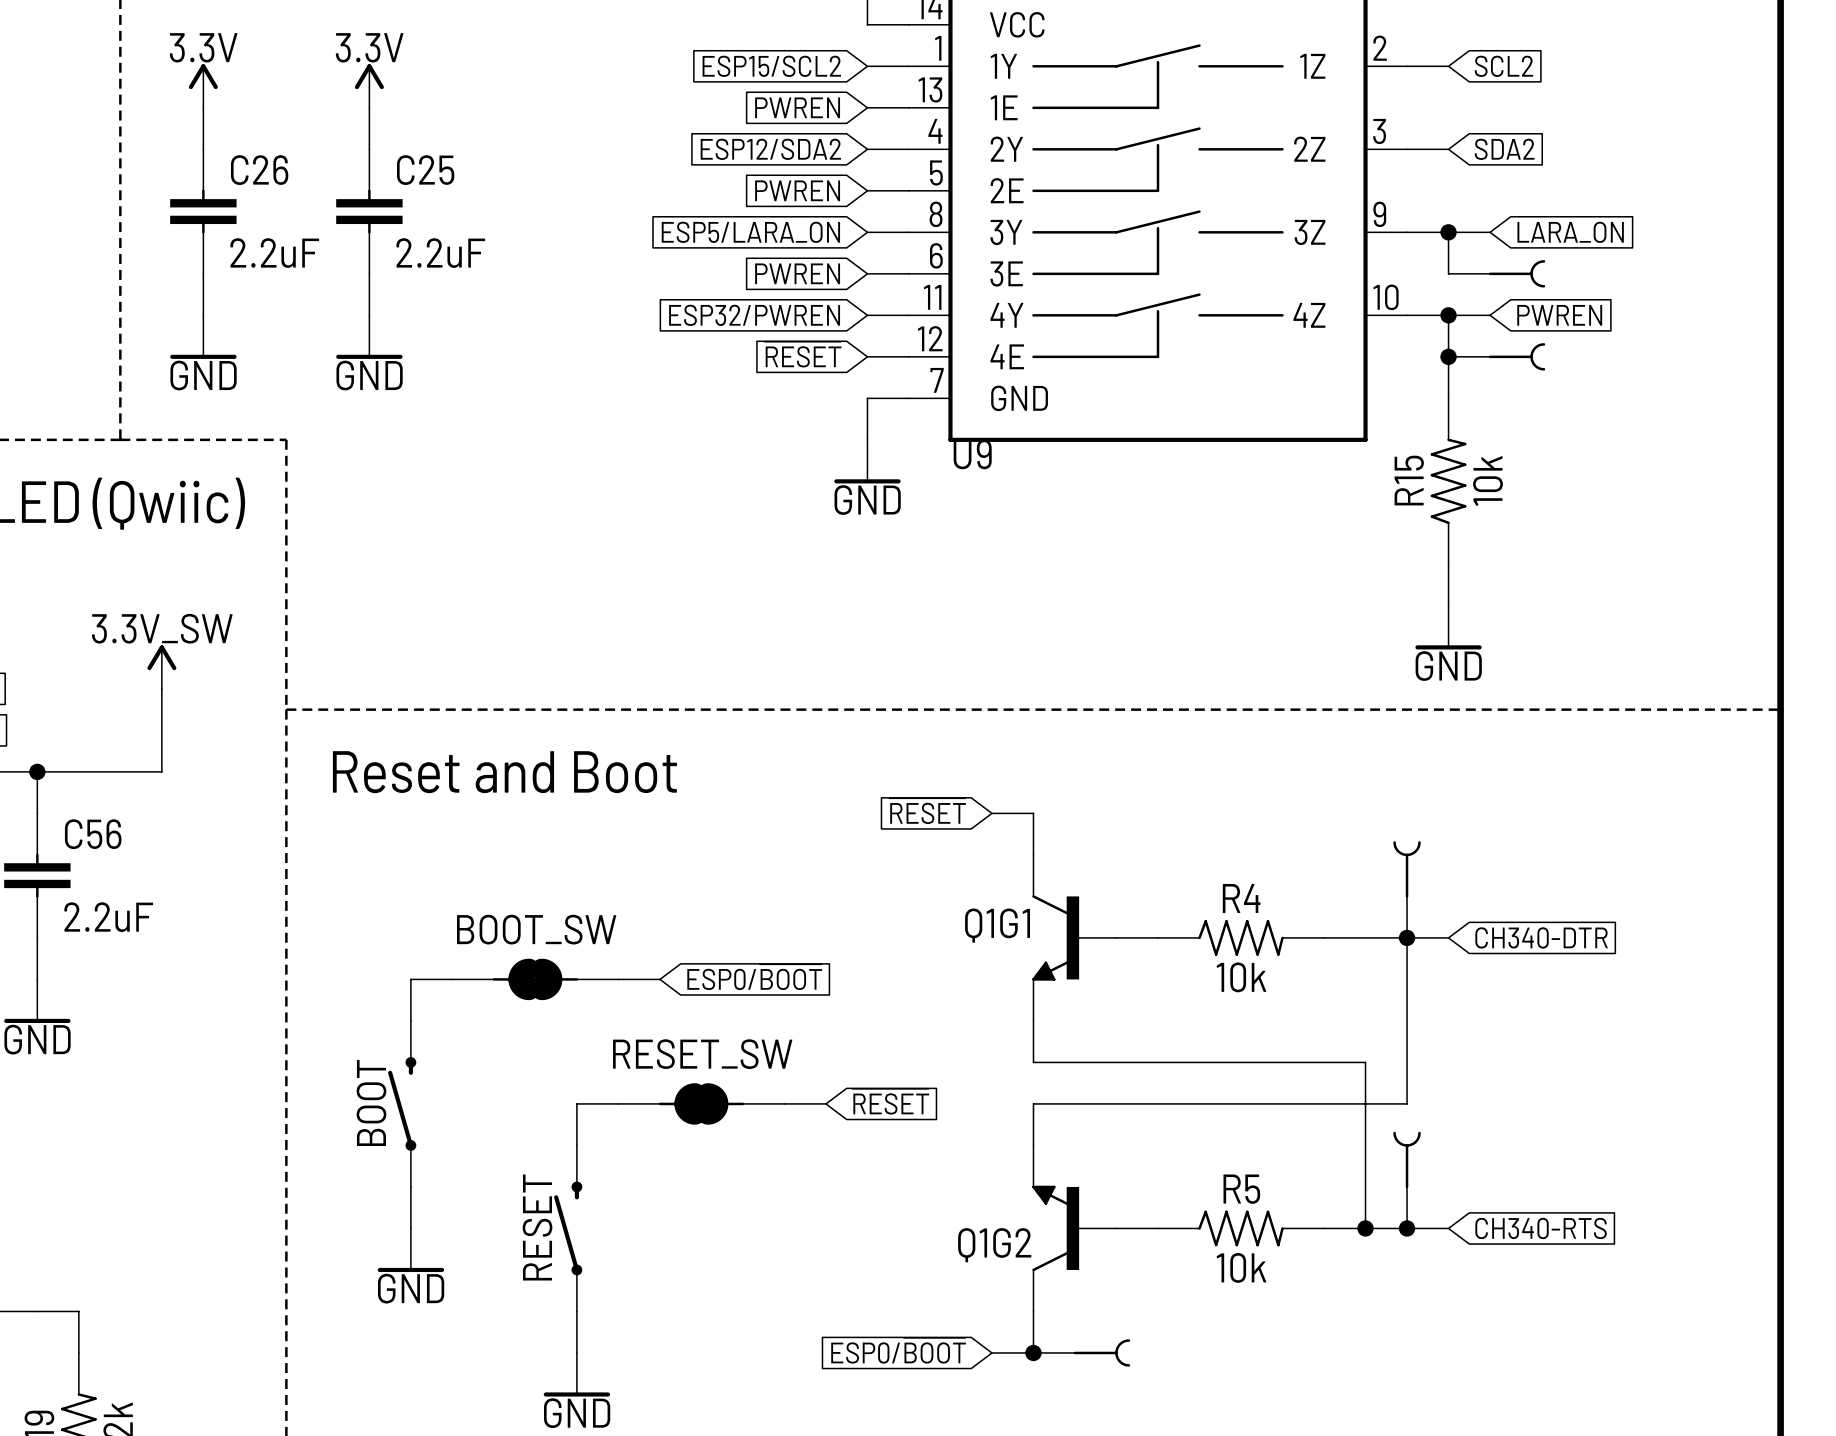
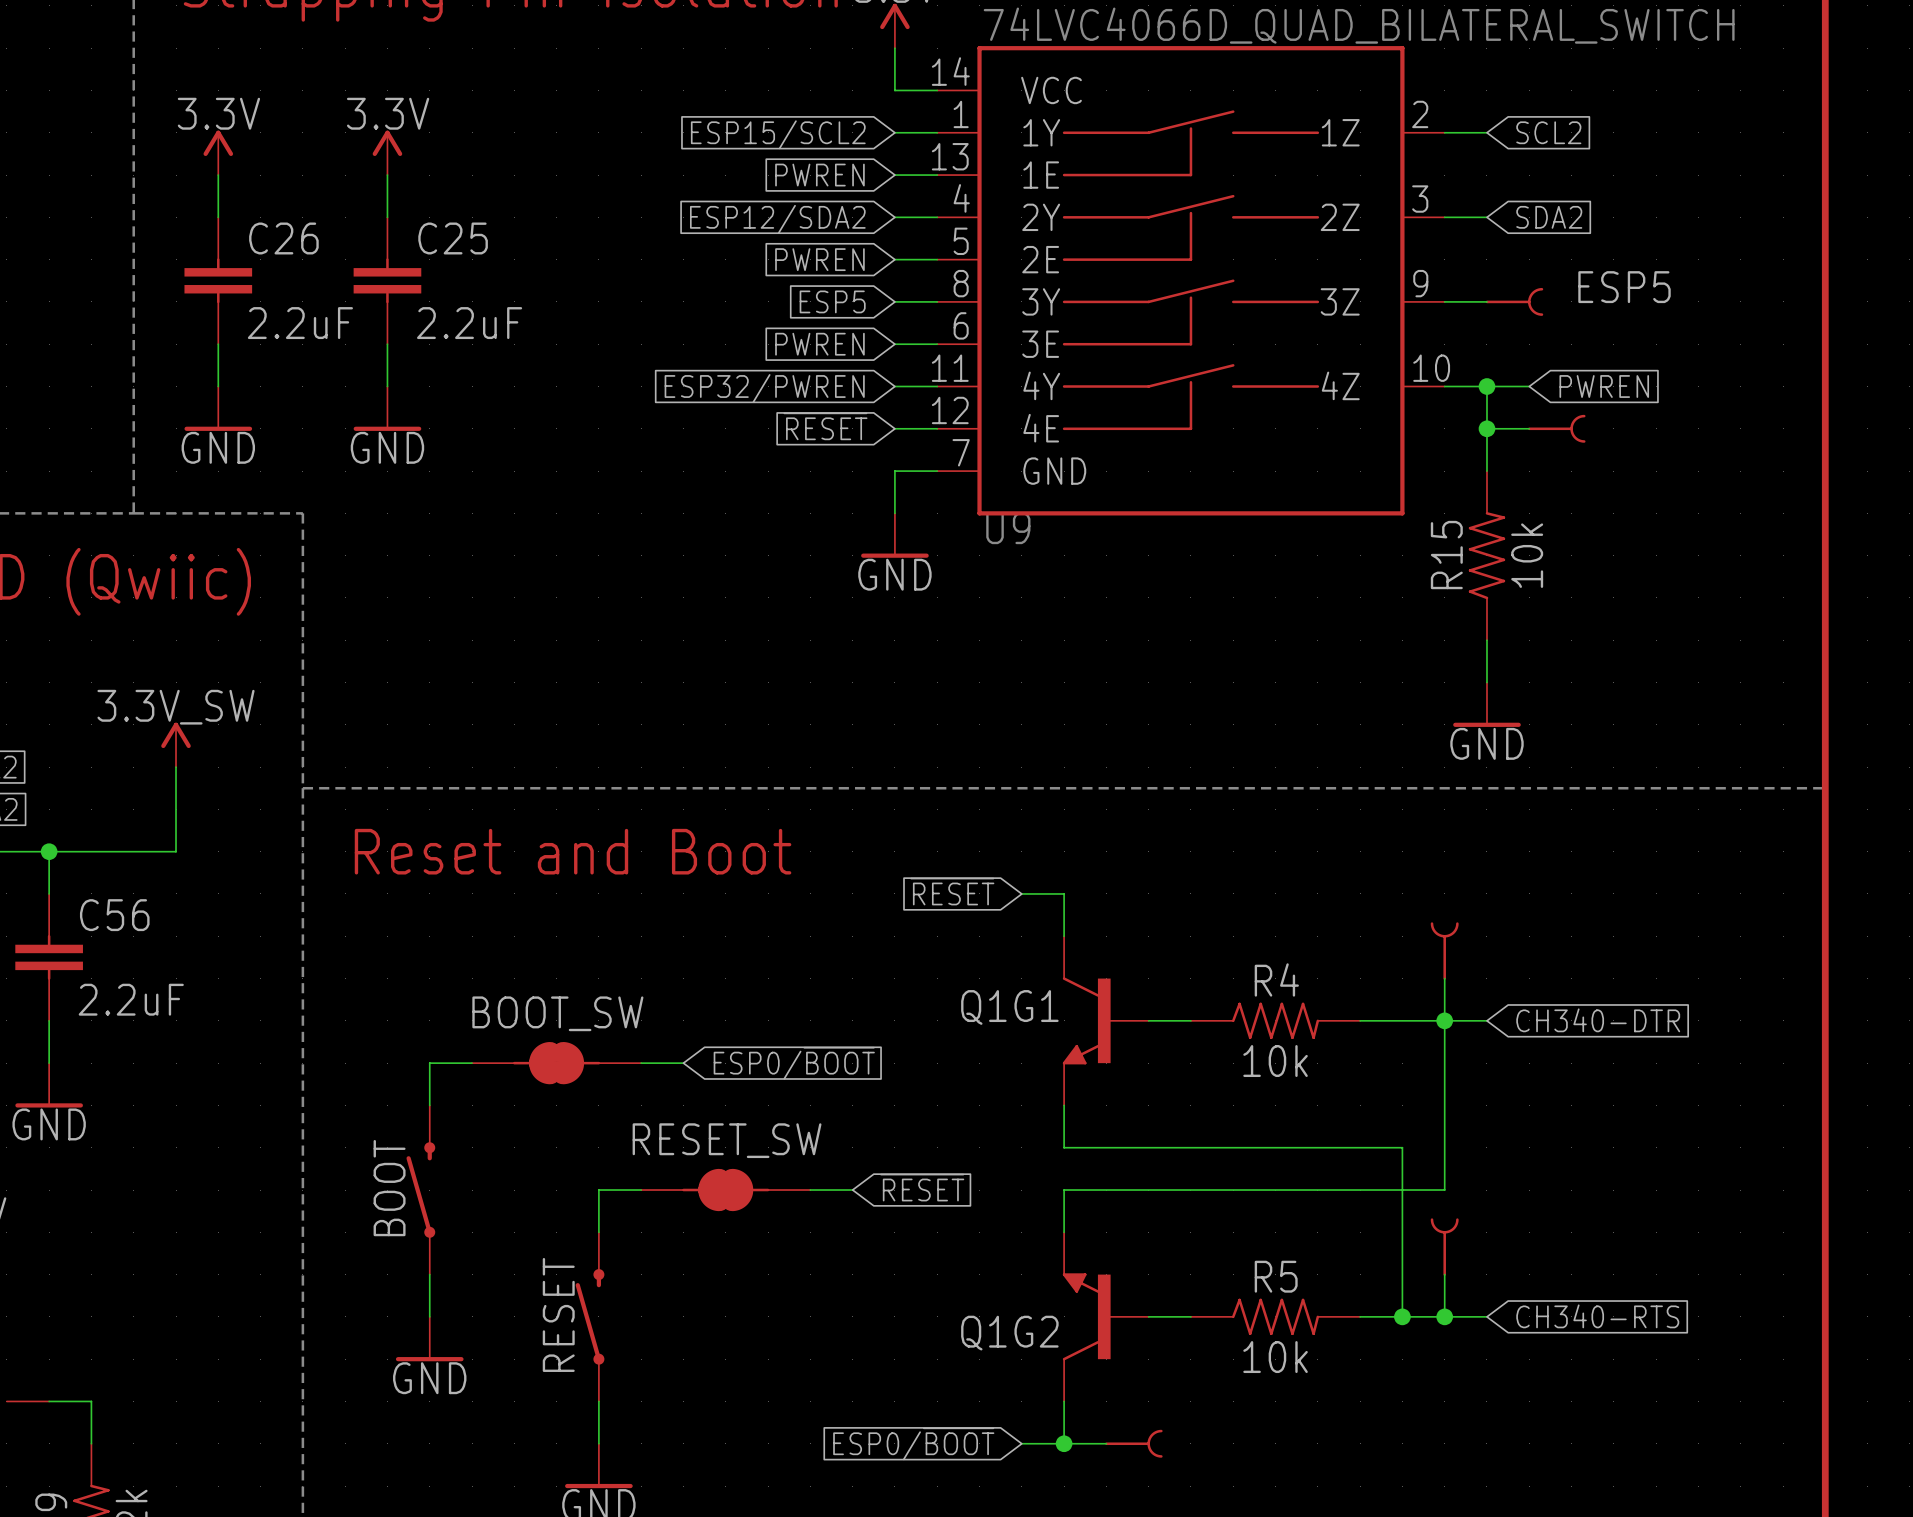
global label: ESP5/LARA_ON (750, 232) -> ESP5 (832, 301)
junction: (1448, 232) -> none
ESP5: none -> (1514, 301)
wire: (1490, 232) (1448, 232) (1448, 273) (1490, 273) -> none
global label: LARA_ON (1570, 232) -> none
part: (1517, 273) -> none

